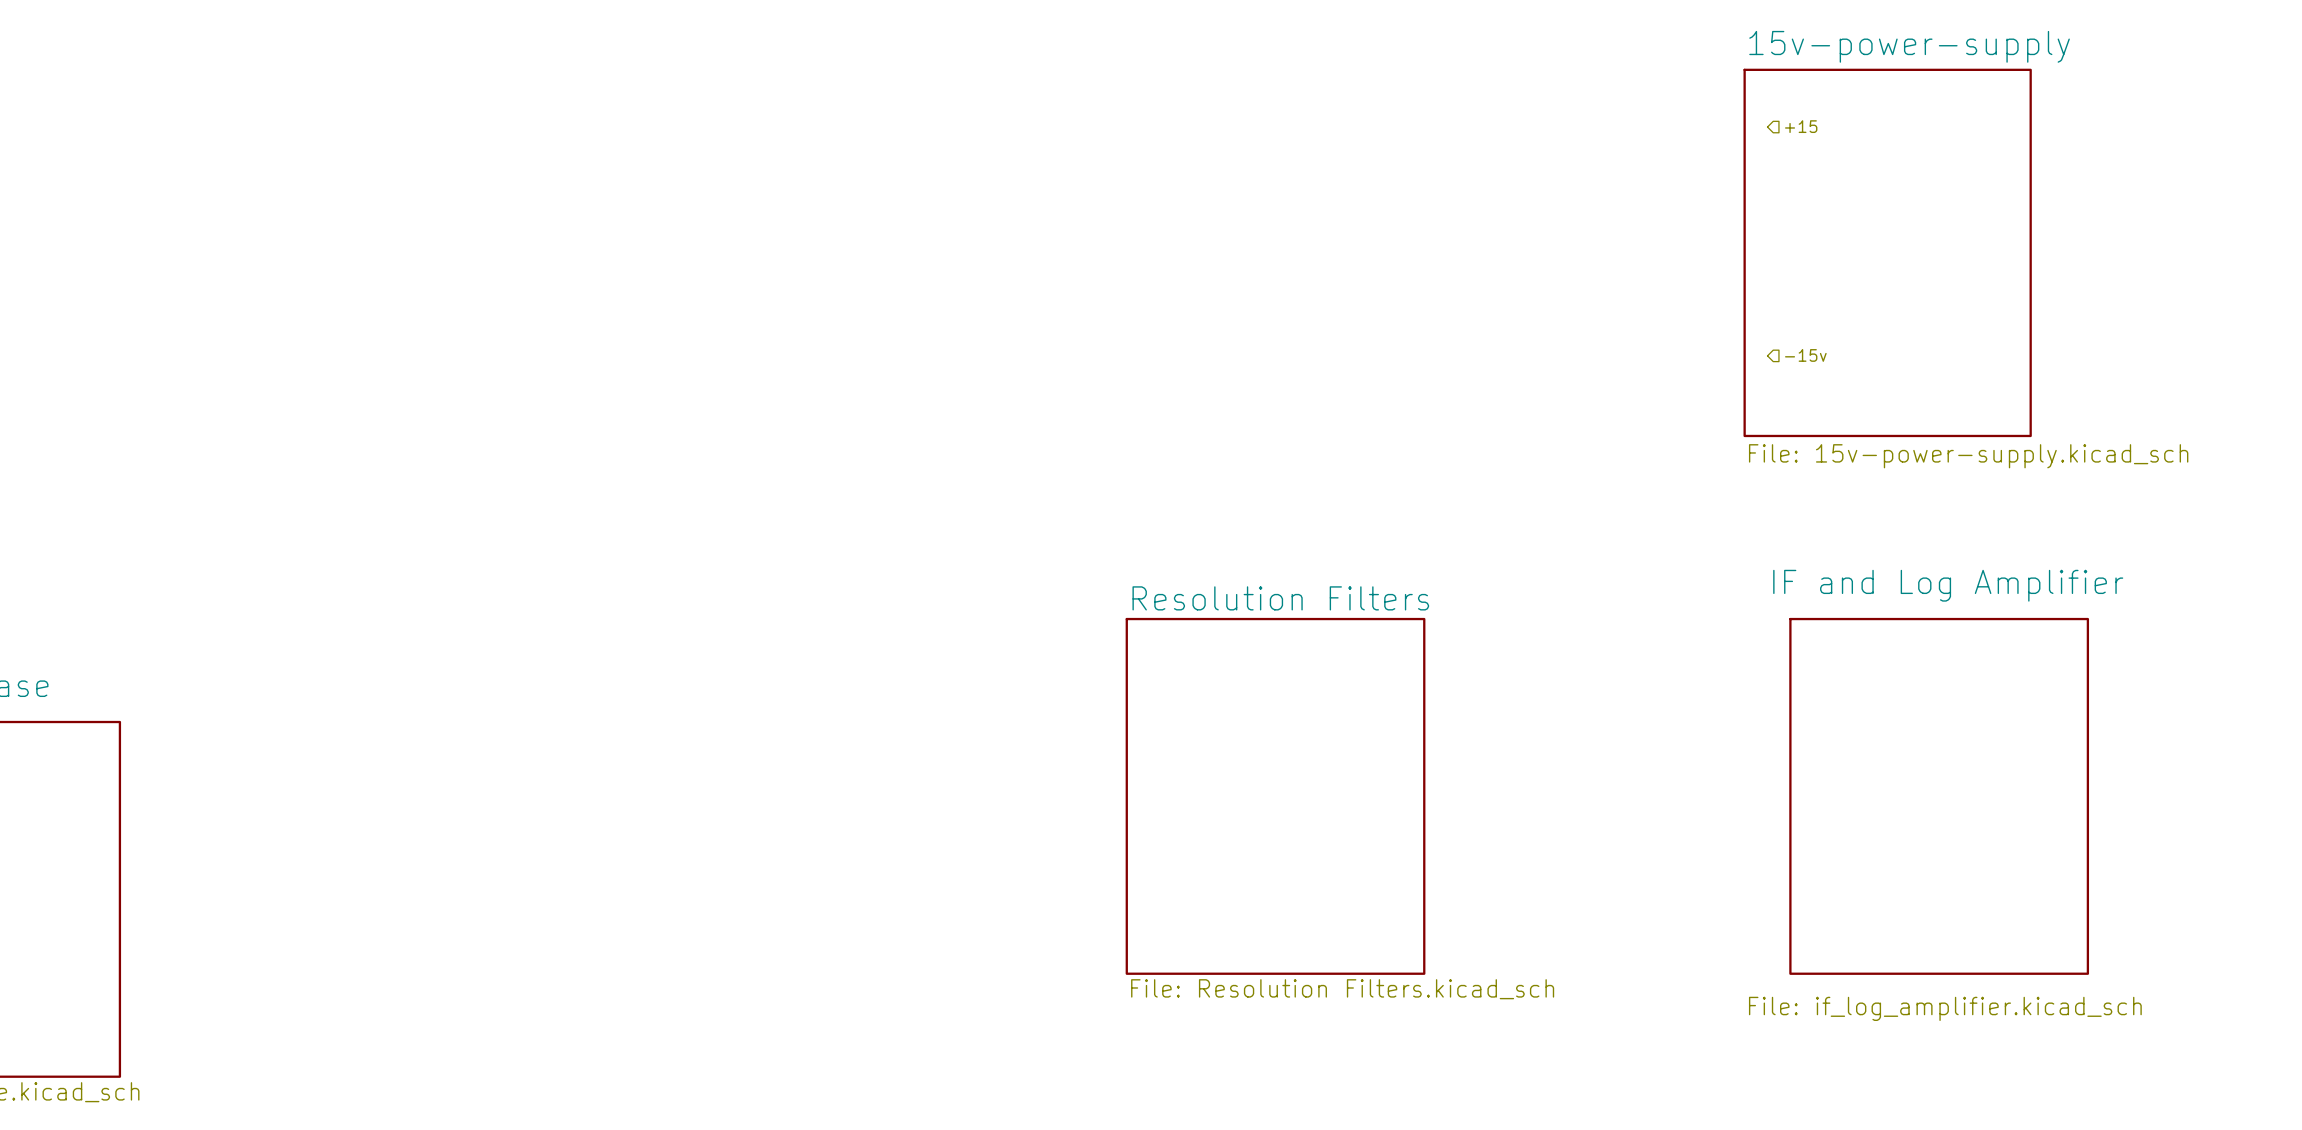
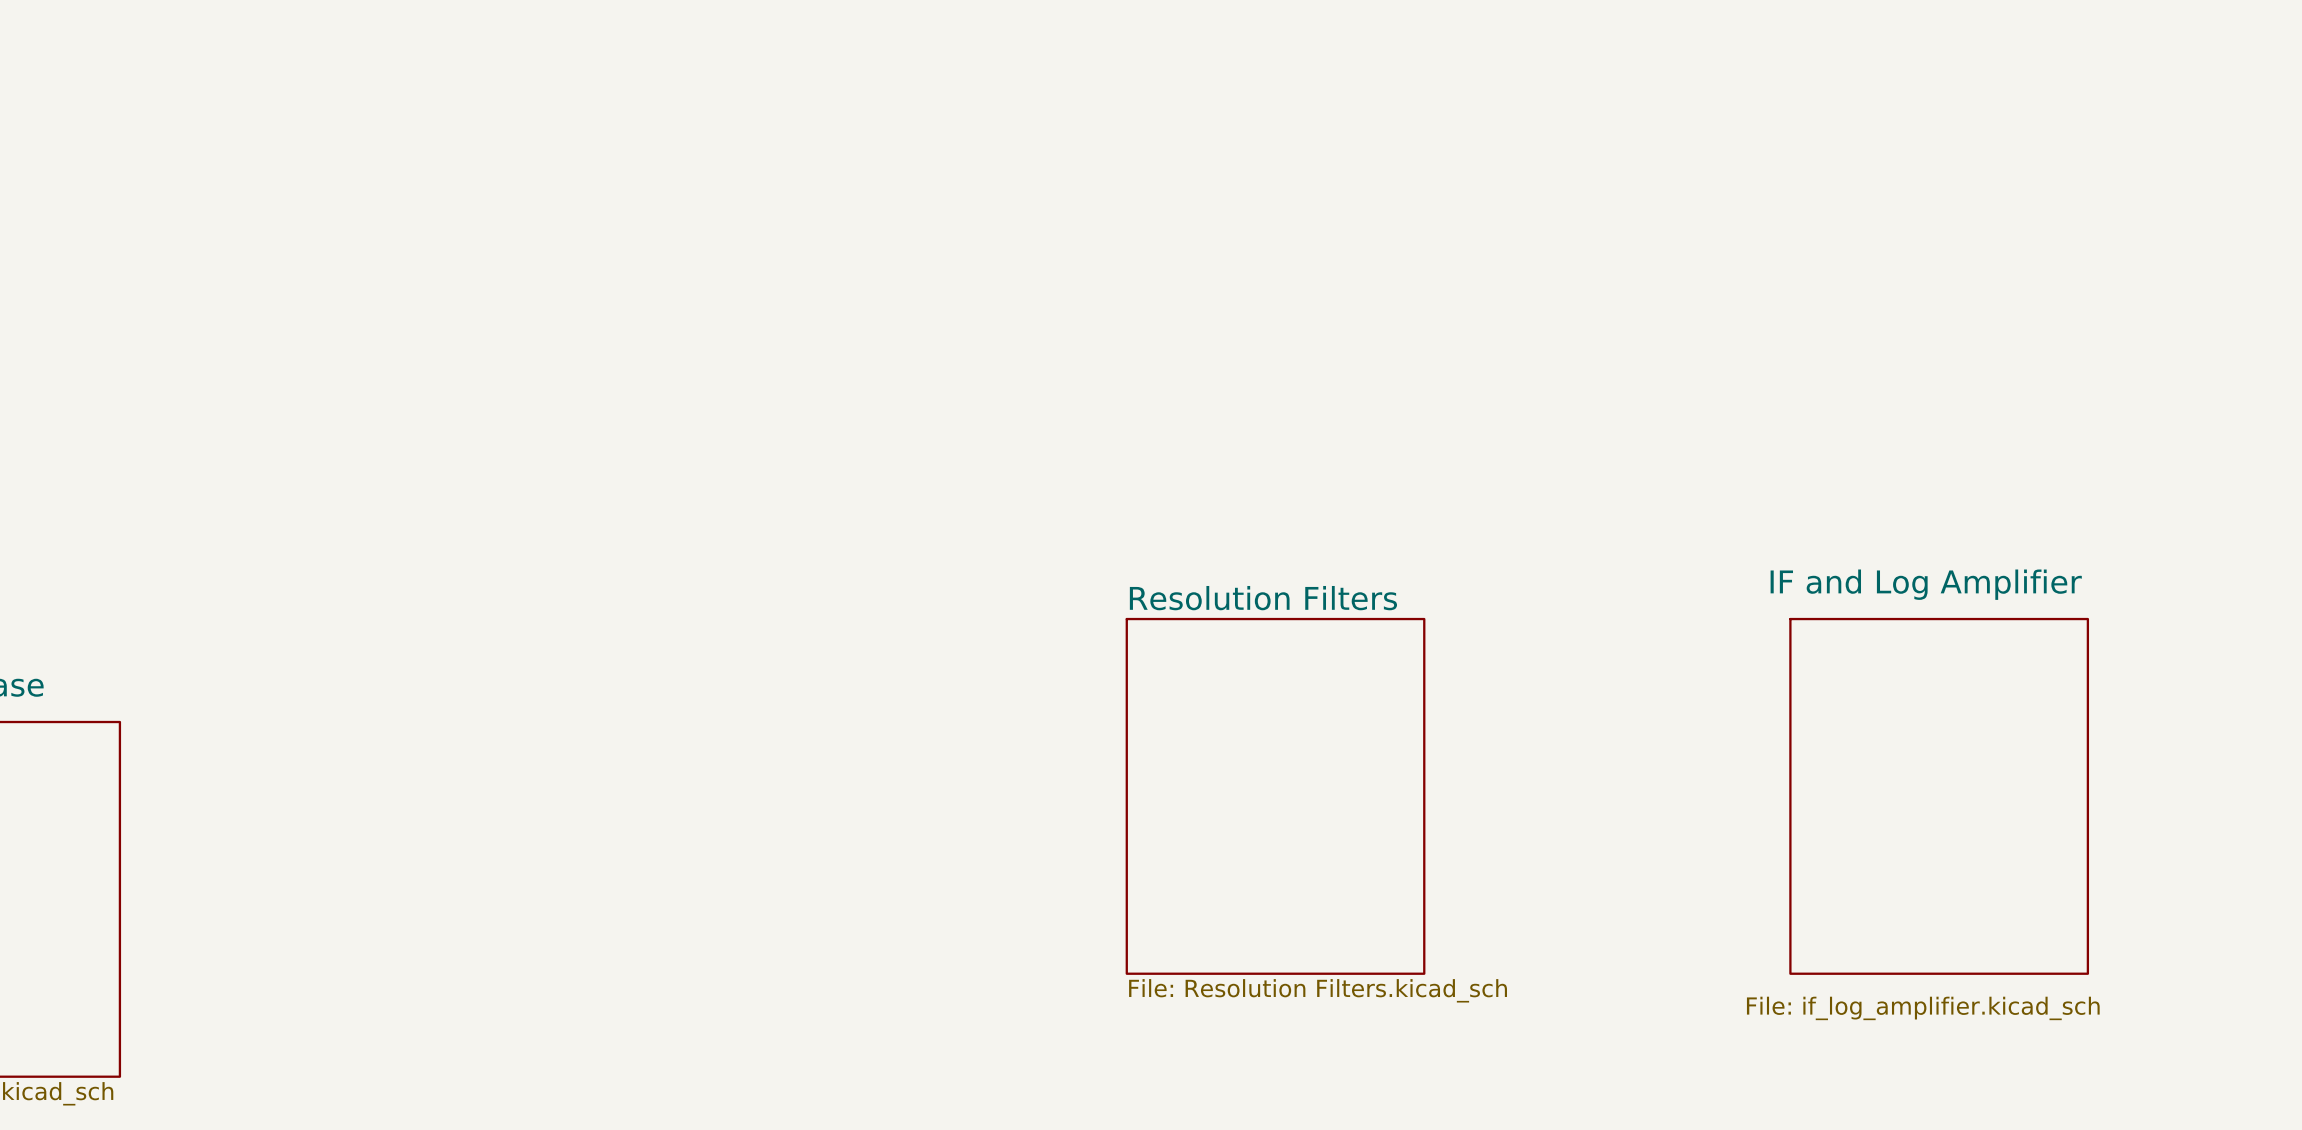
hierarchical label: +15 (1801, 126) -> none
sheet 15v-power-supply: File: 15v-power-supply.kicad_sch (1887, 252) -> none
hierarchical label: -15v (1805, 355) -> none

